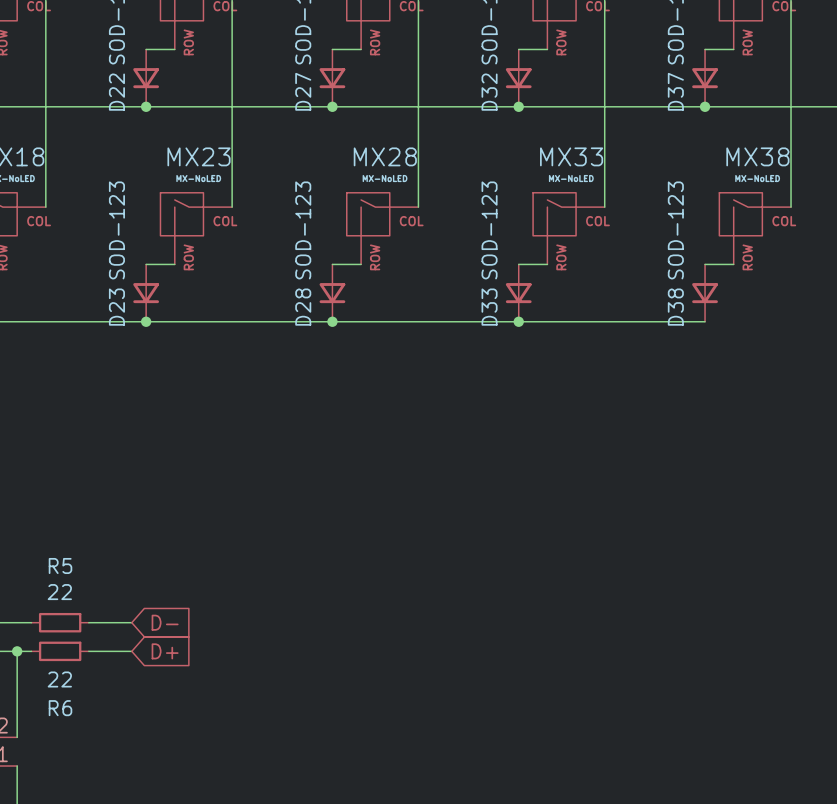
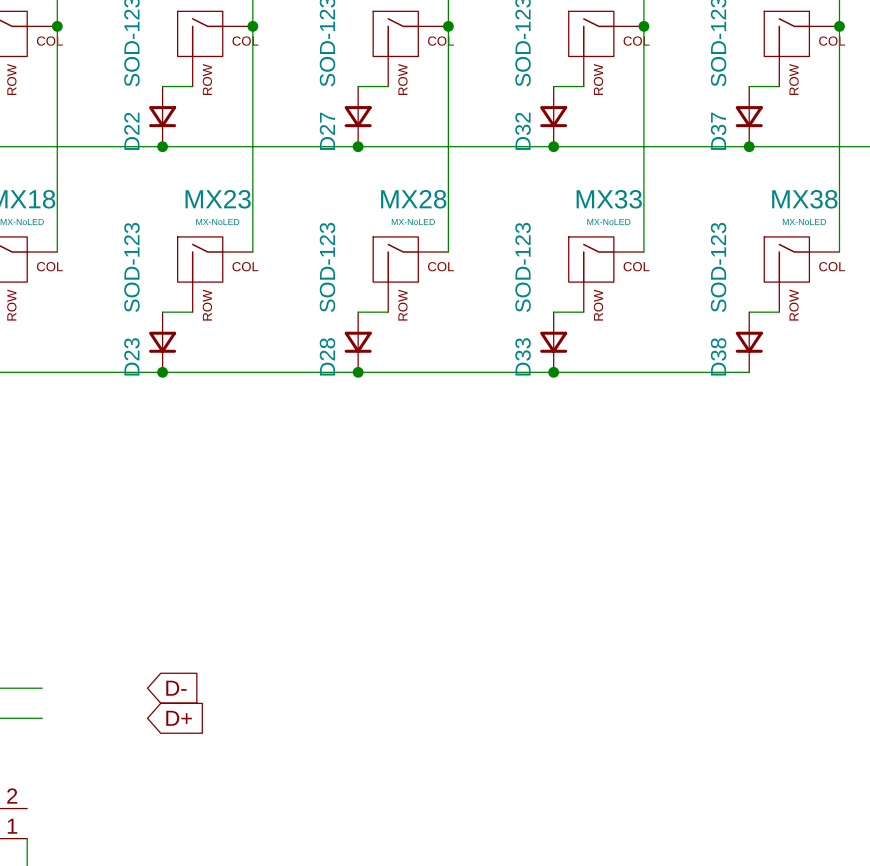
R5: 22 (60, 622) -> none
wire: (88, 622) (131, 622) -> none
wire: (17, 651) (17, 737) -> none
junction: (17, 651) -> none
R6: 22 (60, 651) -> none
wire: (88, 651) (131, 651) -> none

